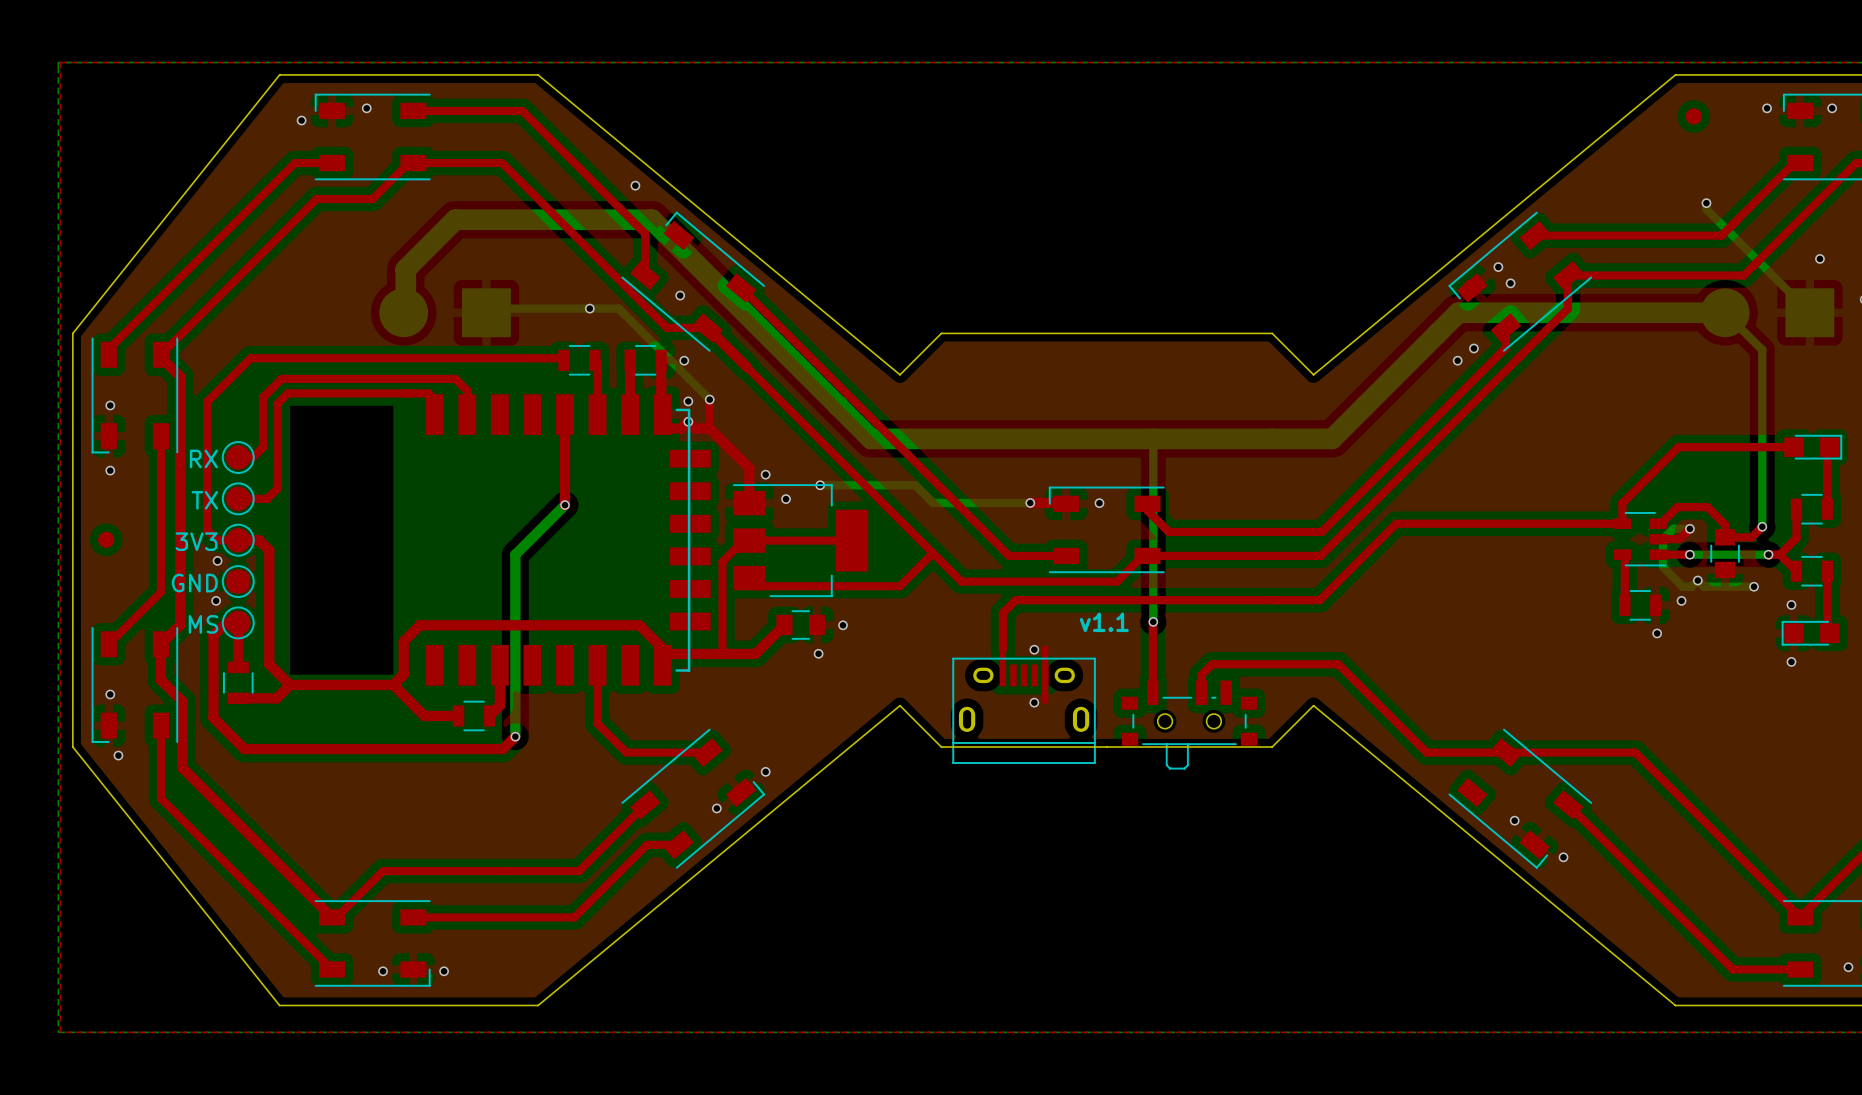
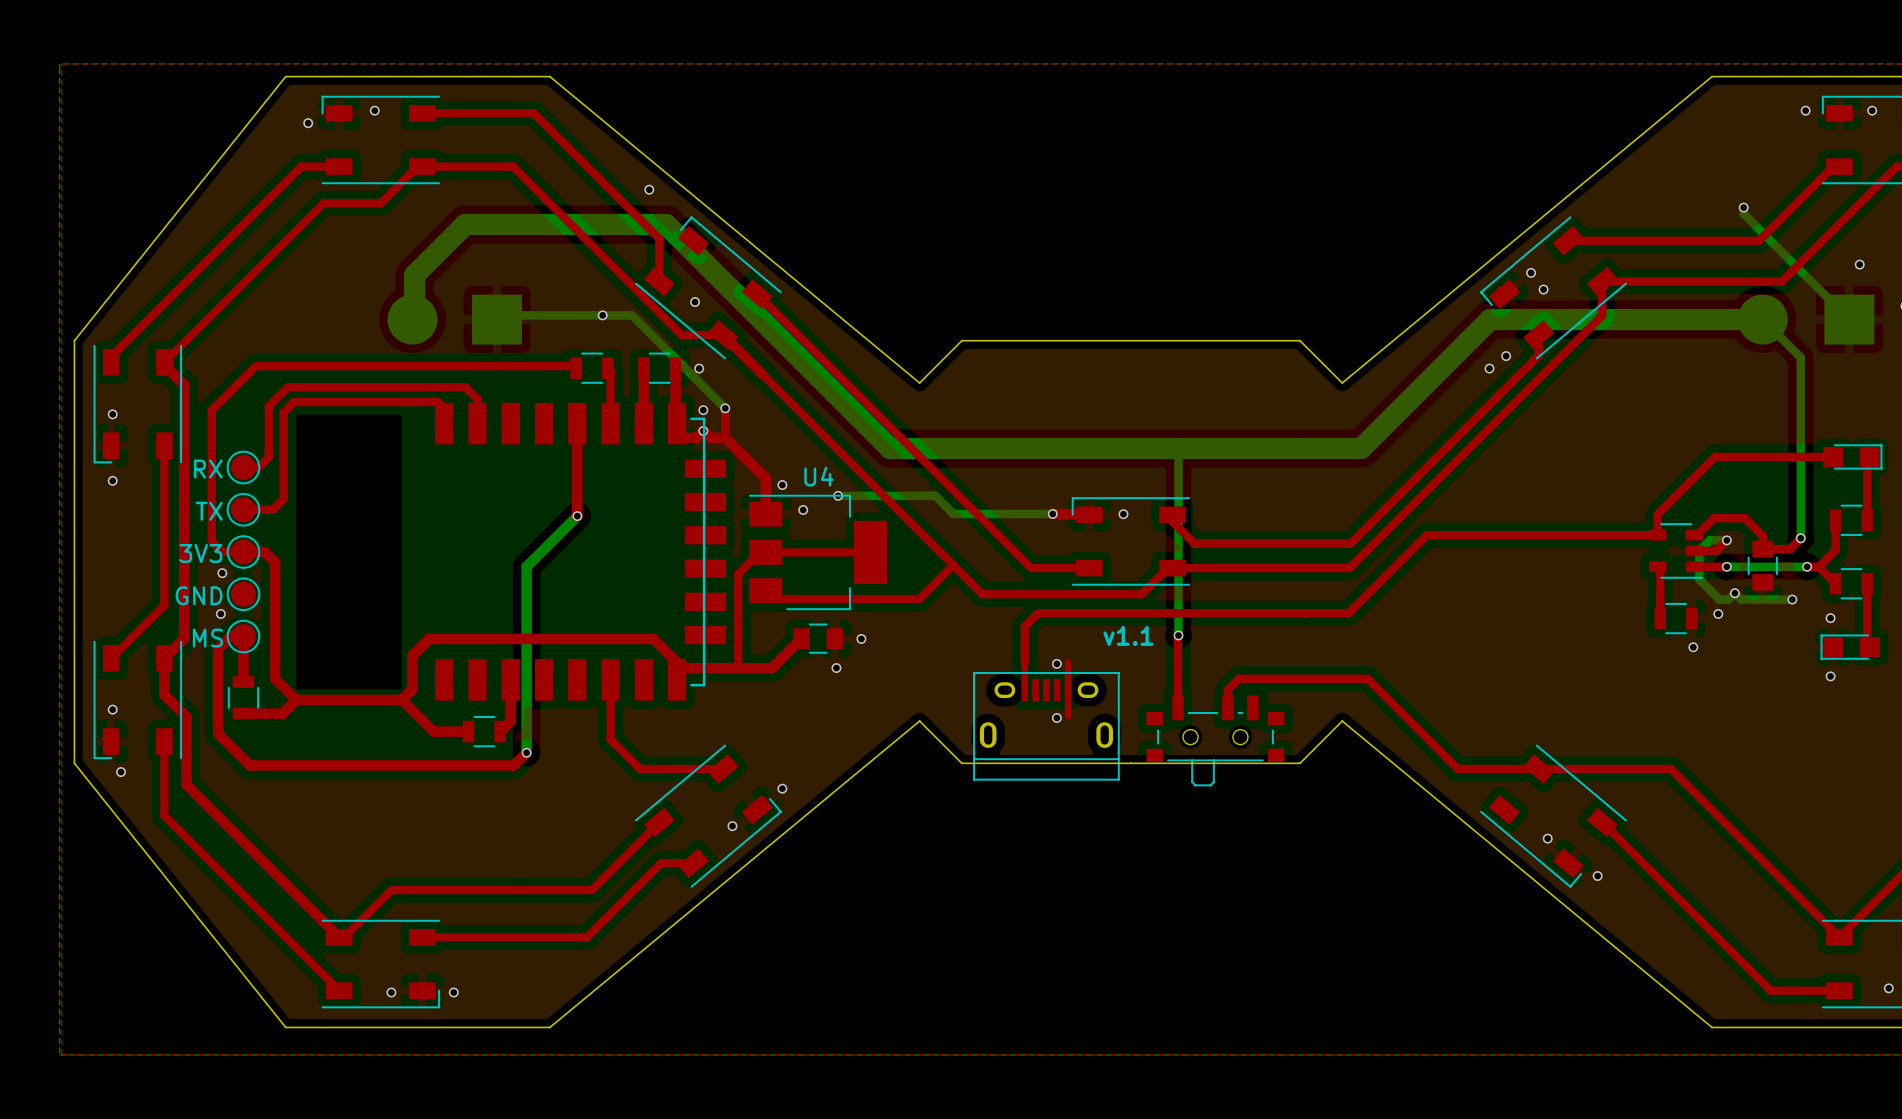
part: (1693, 116) -> none
U4 name: none -> U4 (818, 476)
part: (106, 539) -> none

